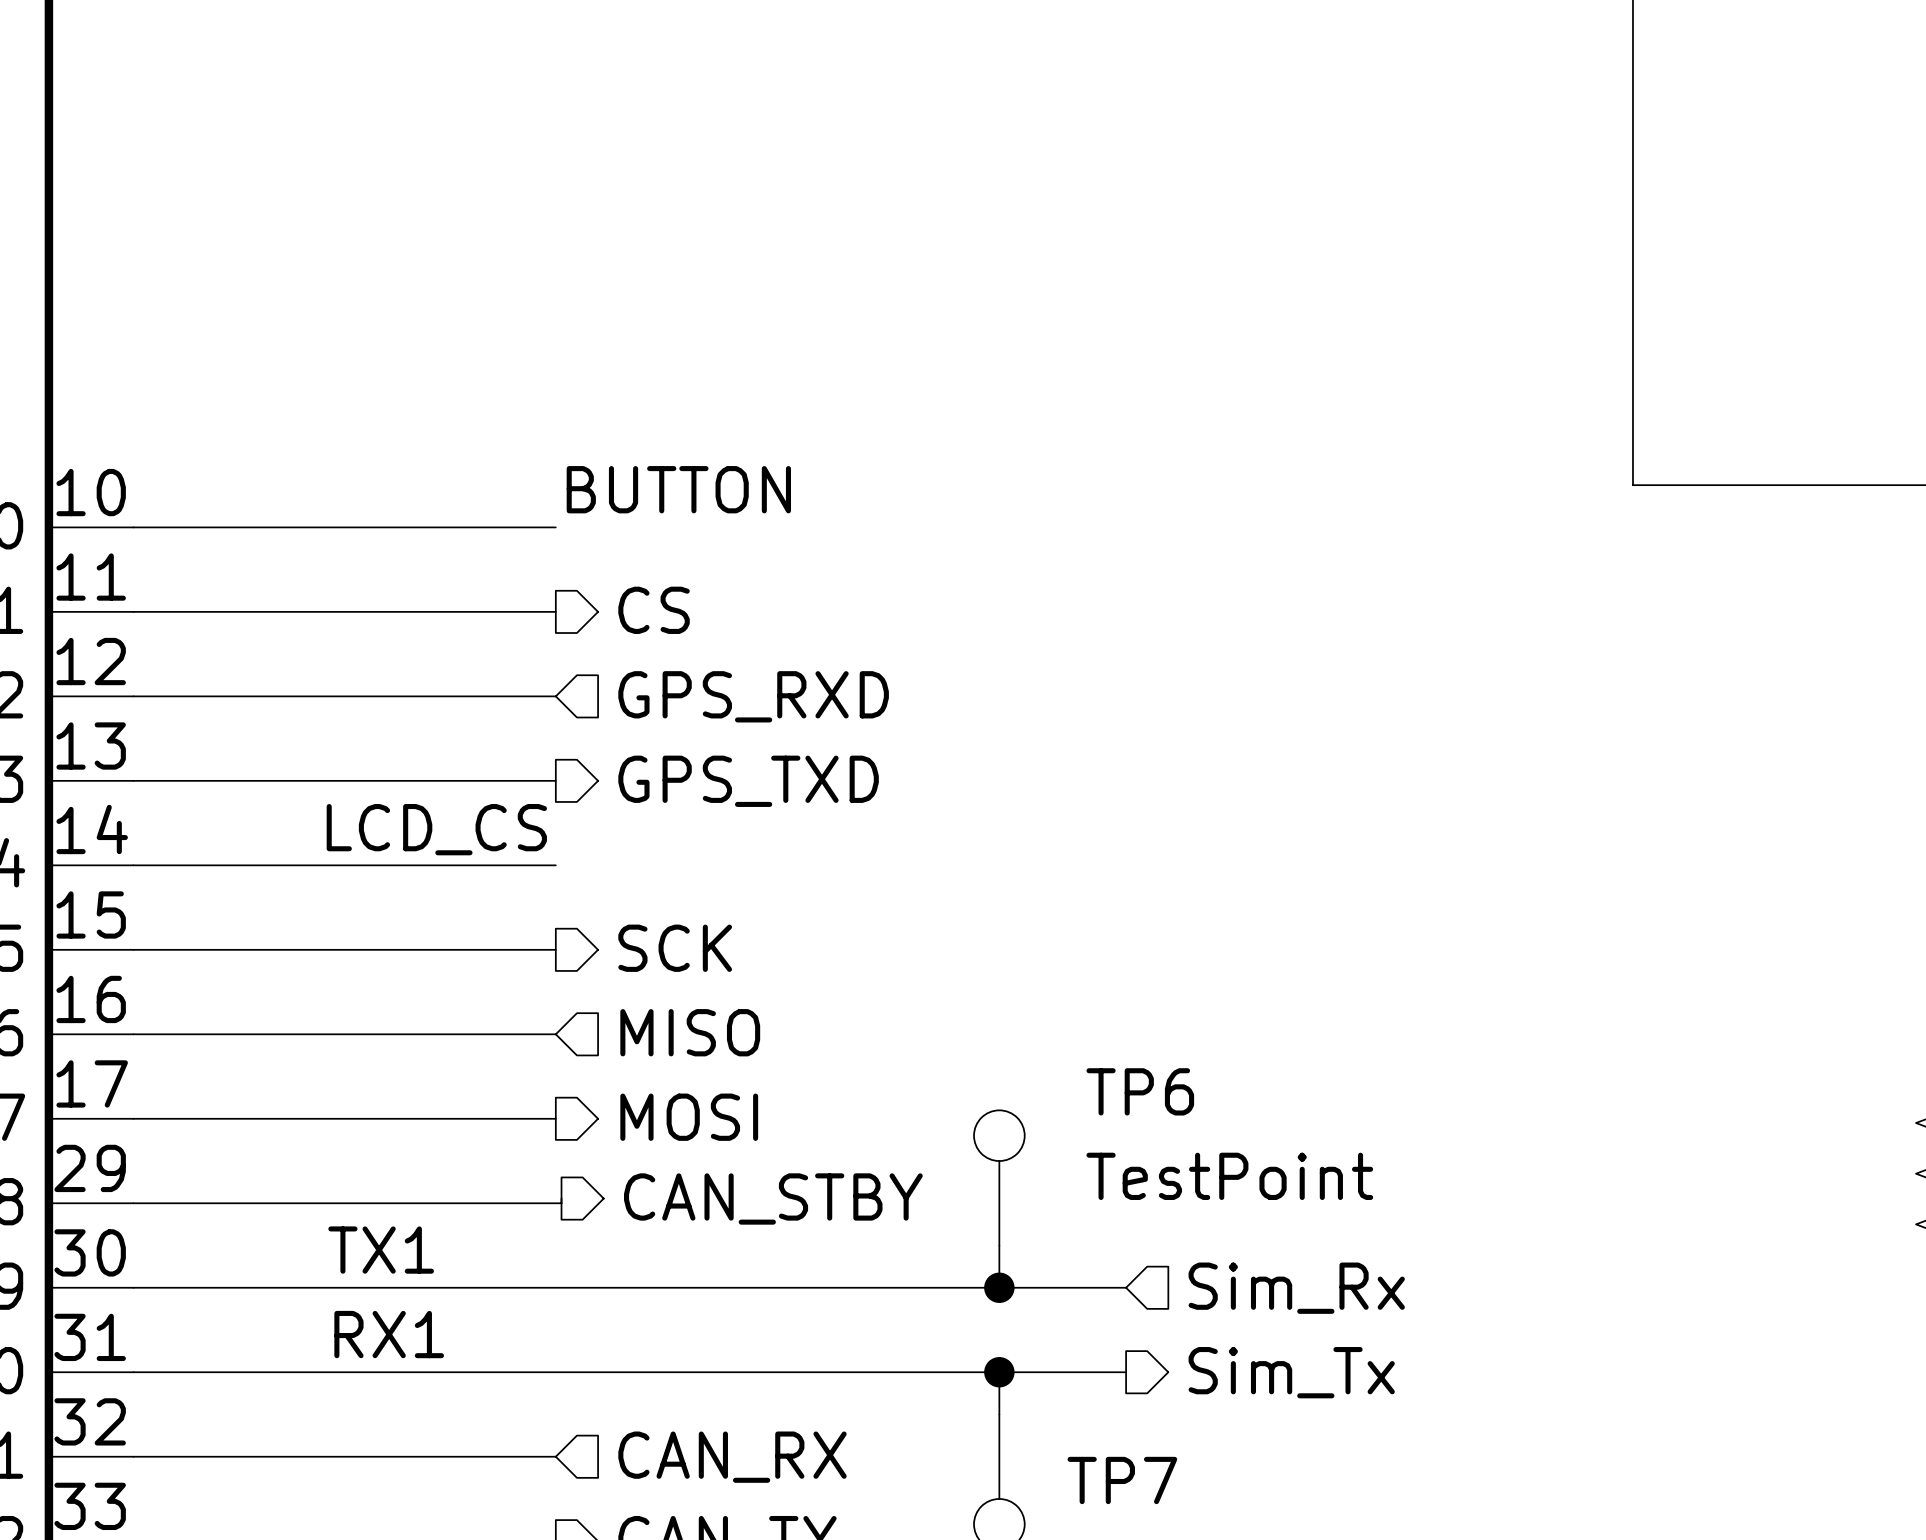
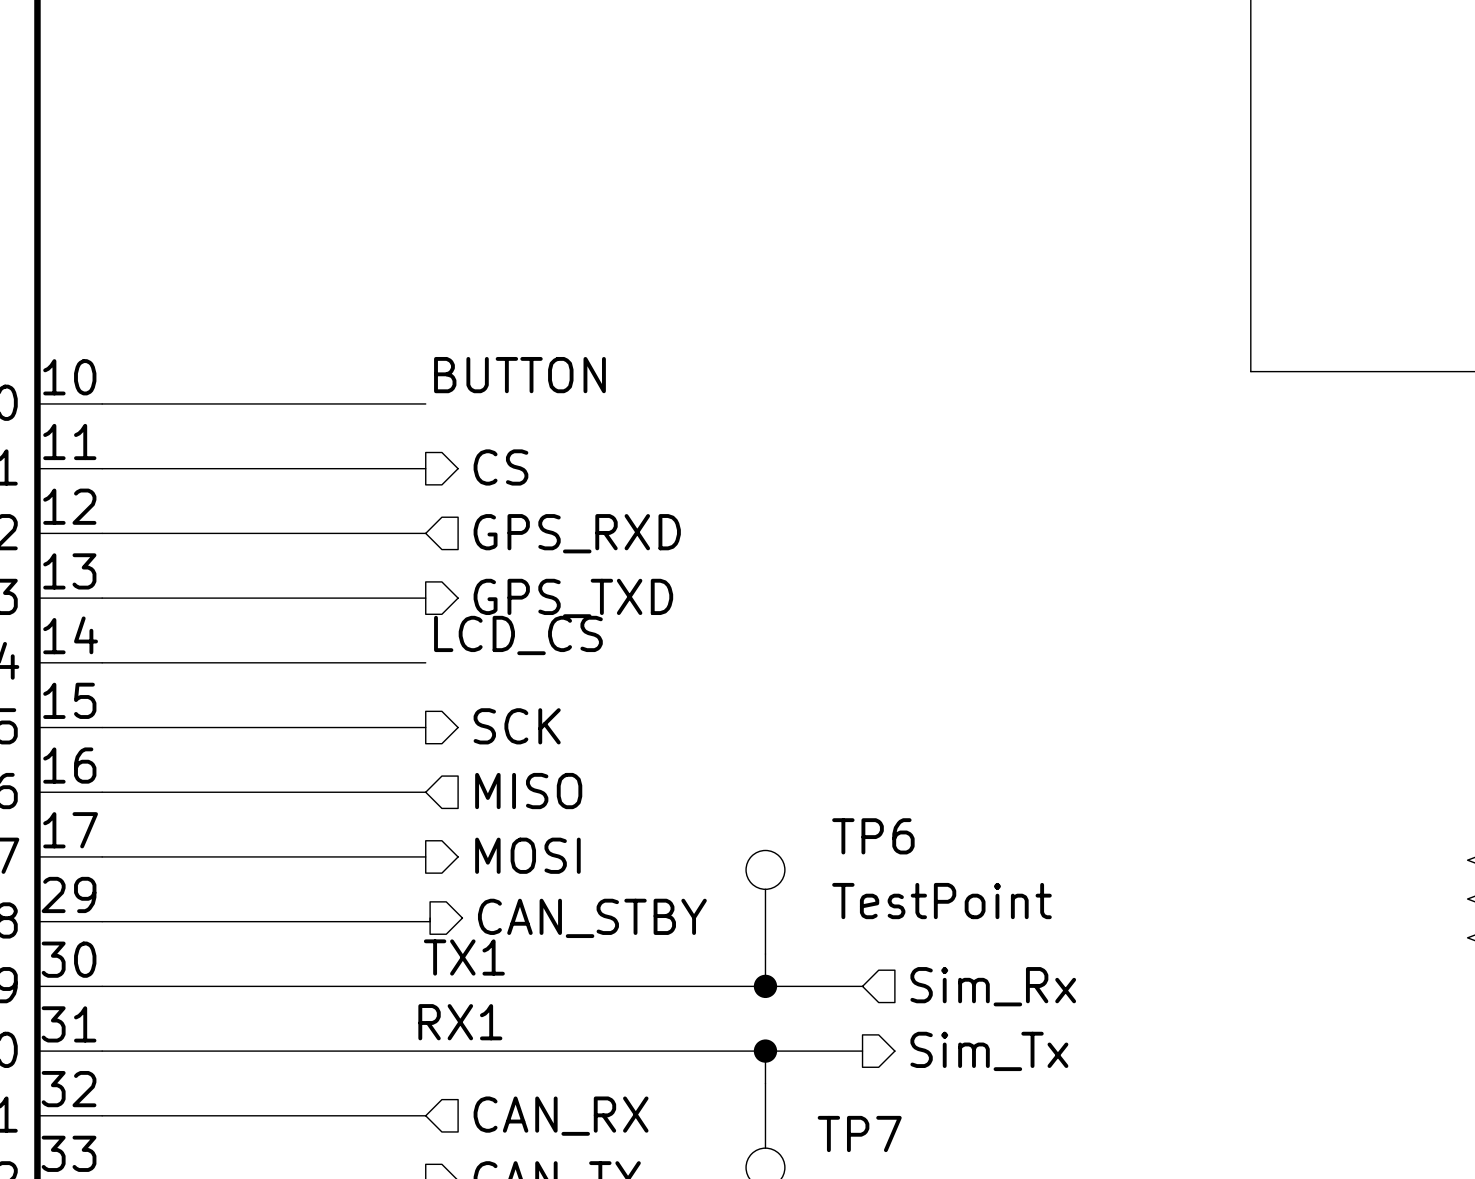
label position: LCD_CS (436, 829) -> LCD_CS (518, 635)
label position: TX1 (381, 1250) -> TX1 (464, 957)
label position: RX1 (389, 1334) -> RX1 (460, 1022)

